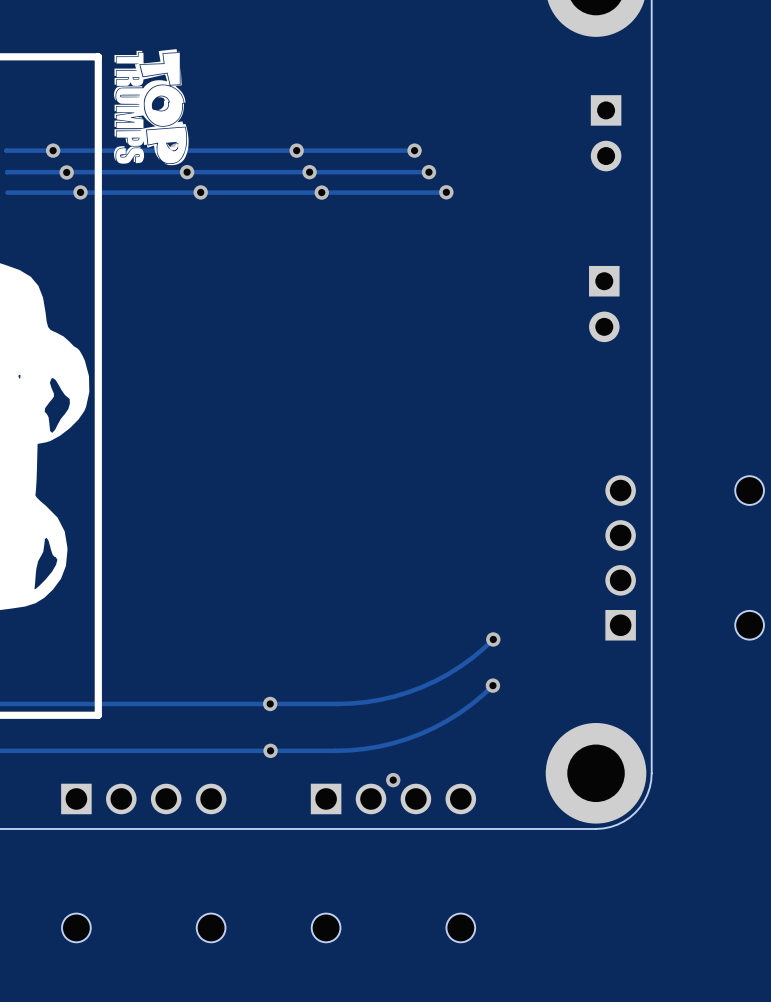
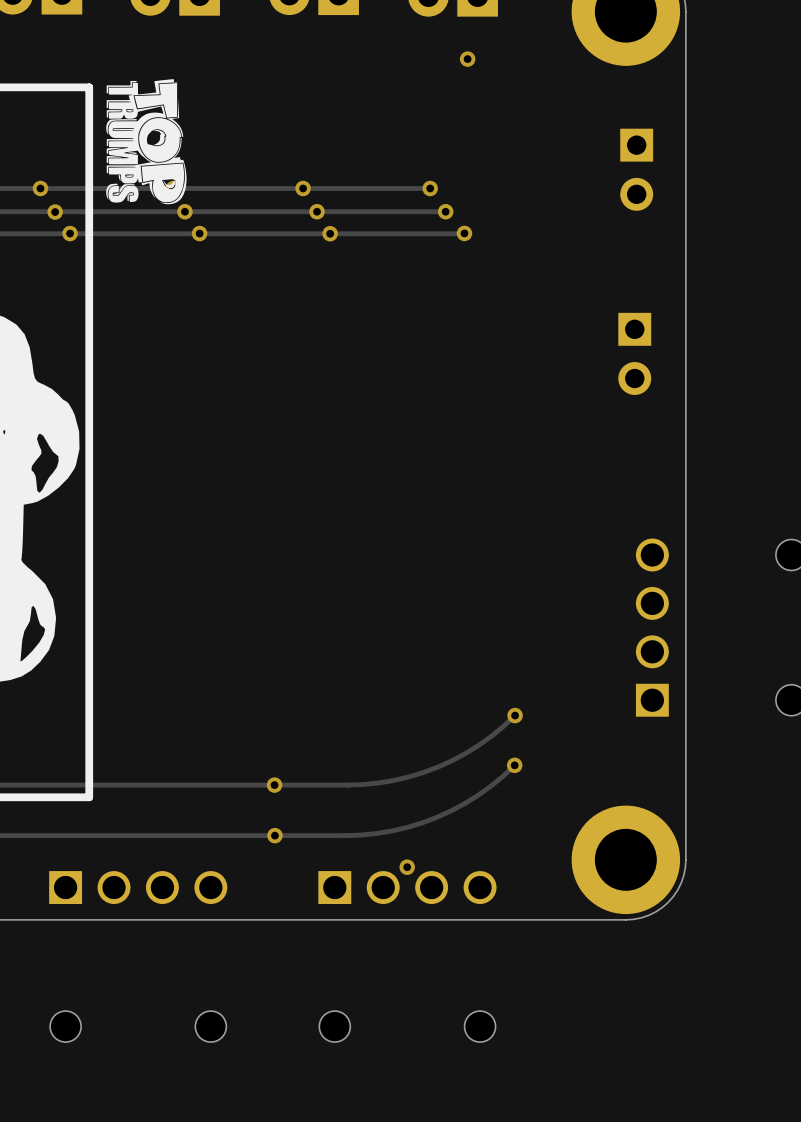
via: none -> (467, 59)

